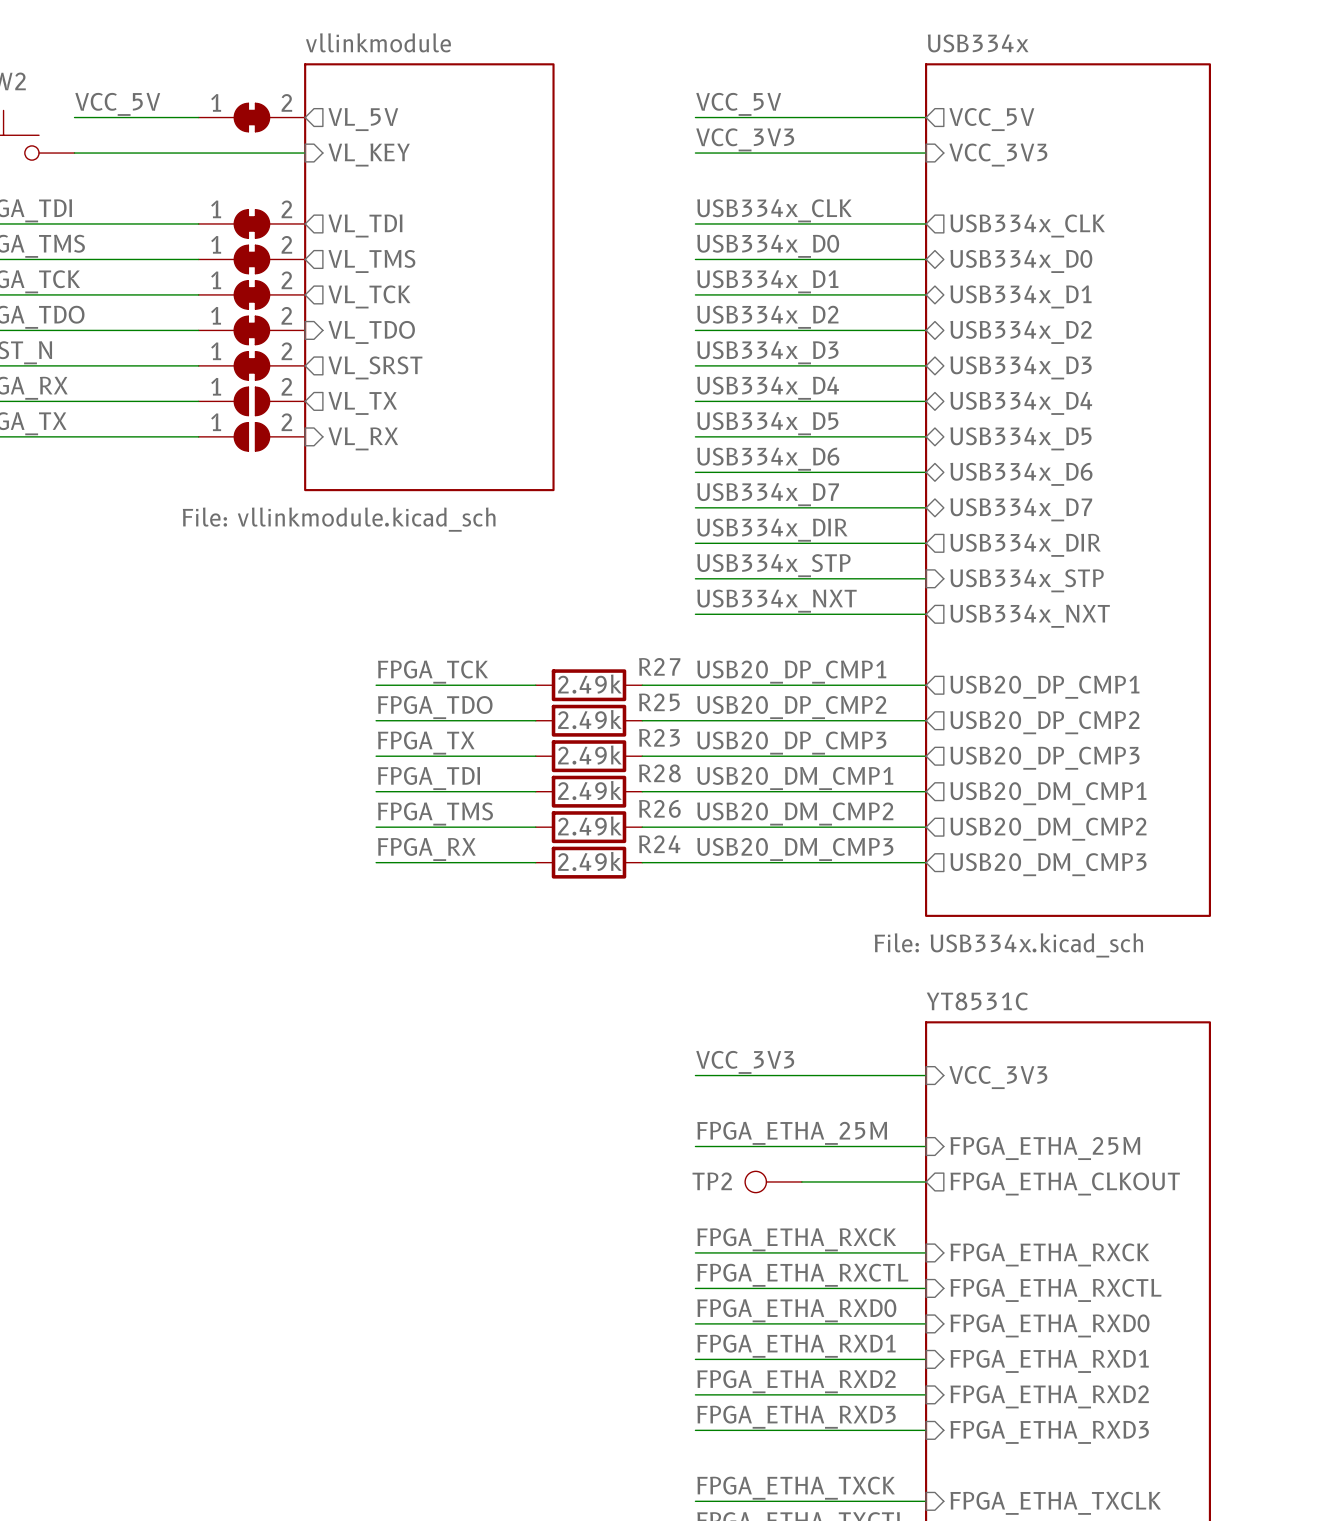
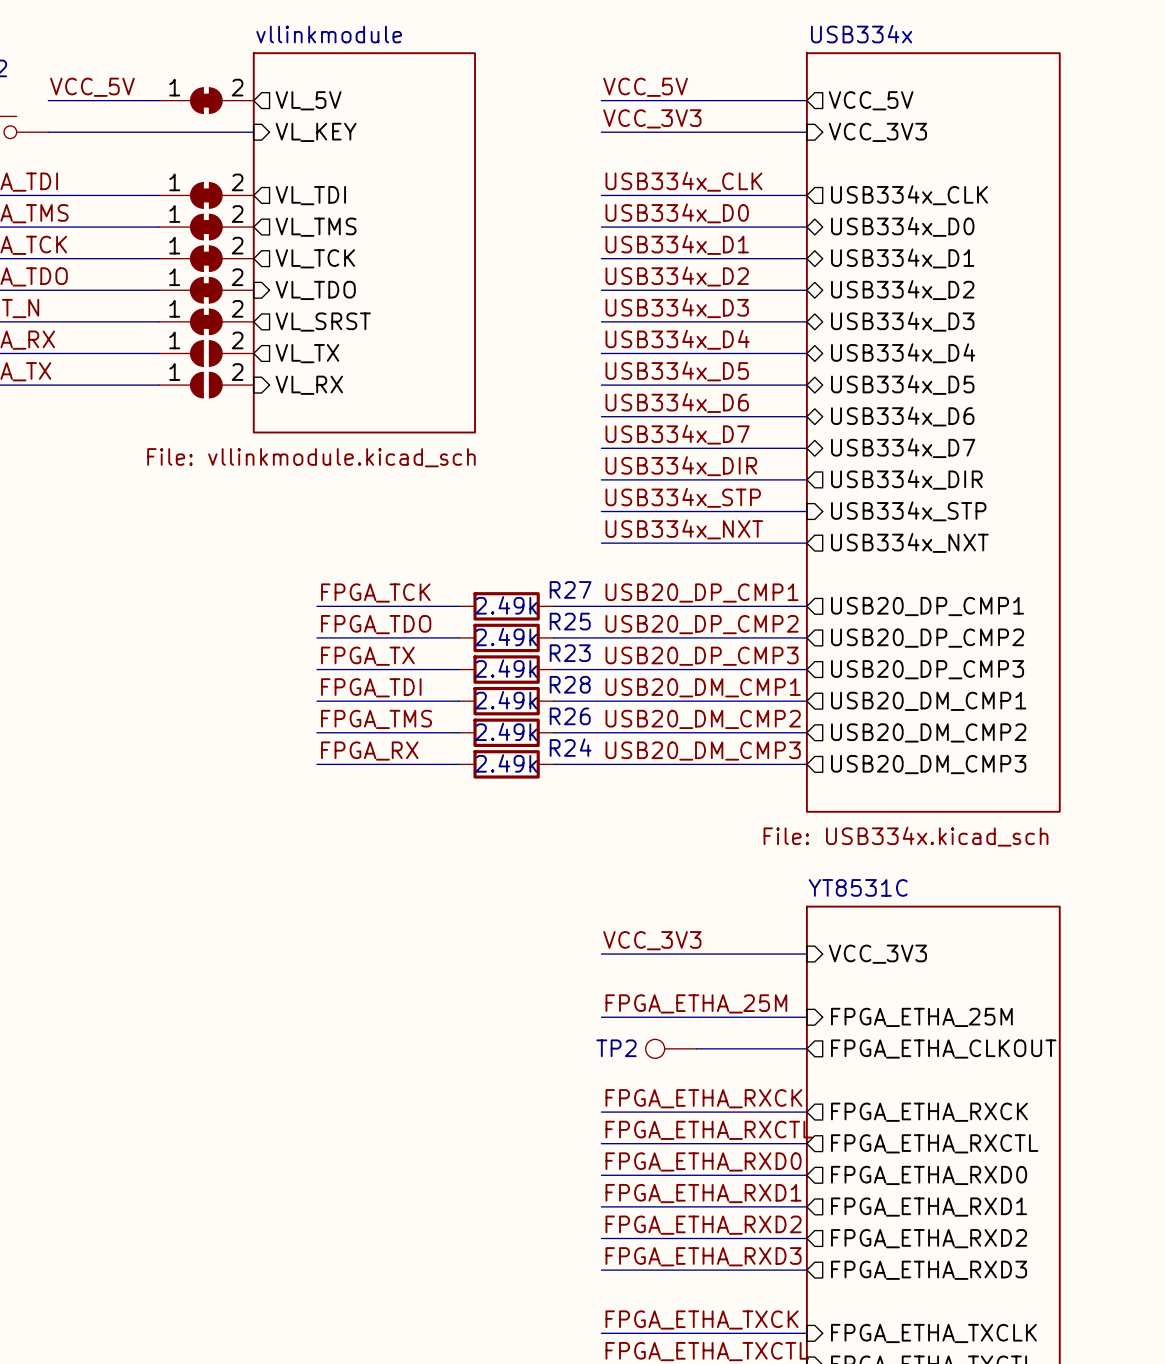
sheet pin shape: input (1049, 1254) -> output (929, 1112)
sheet pin shape: input (1055, 1290) -> output (934, 1143)
sheet pin shape: input (1049, 1325) -> output (929, 1175)
sheet pin shape: input (1049, 1361) -> output (929, 1207)
sheet pin shape: input (1049, 1396) -> output (929, 1238)
sheet pin shape: input (1049, 1432) -> output (929, 1270)

